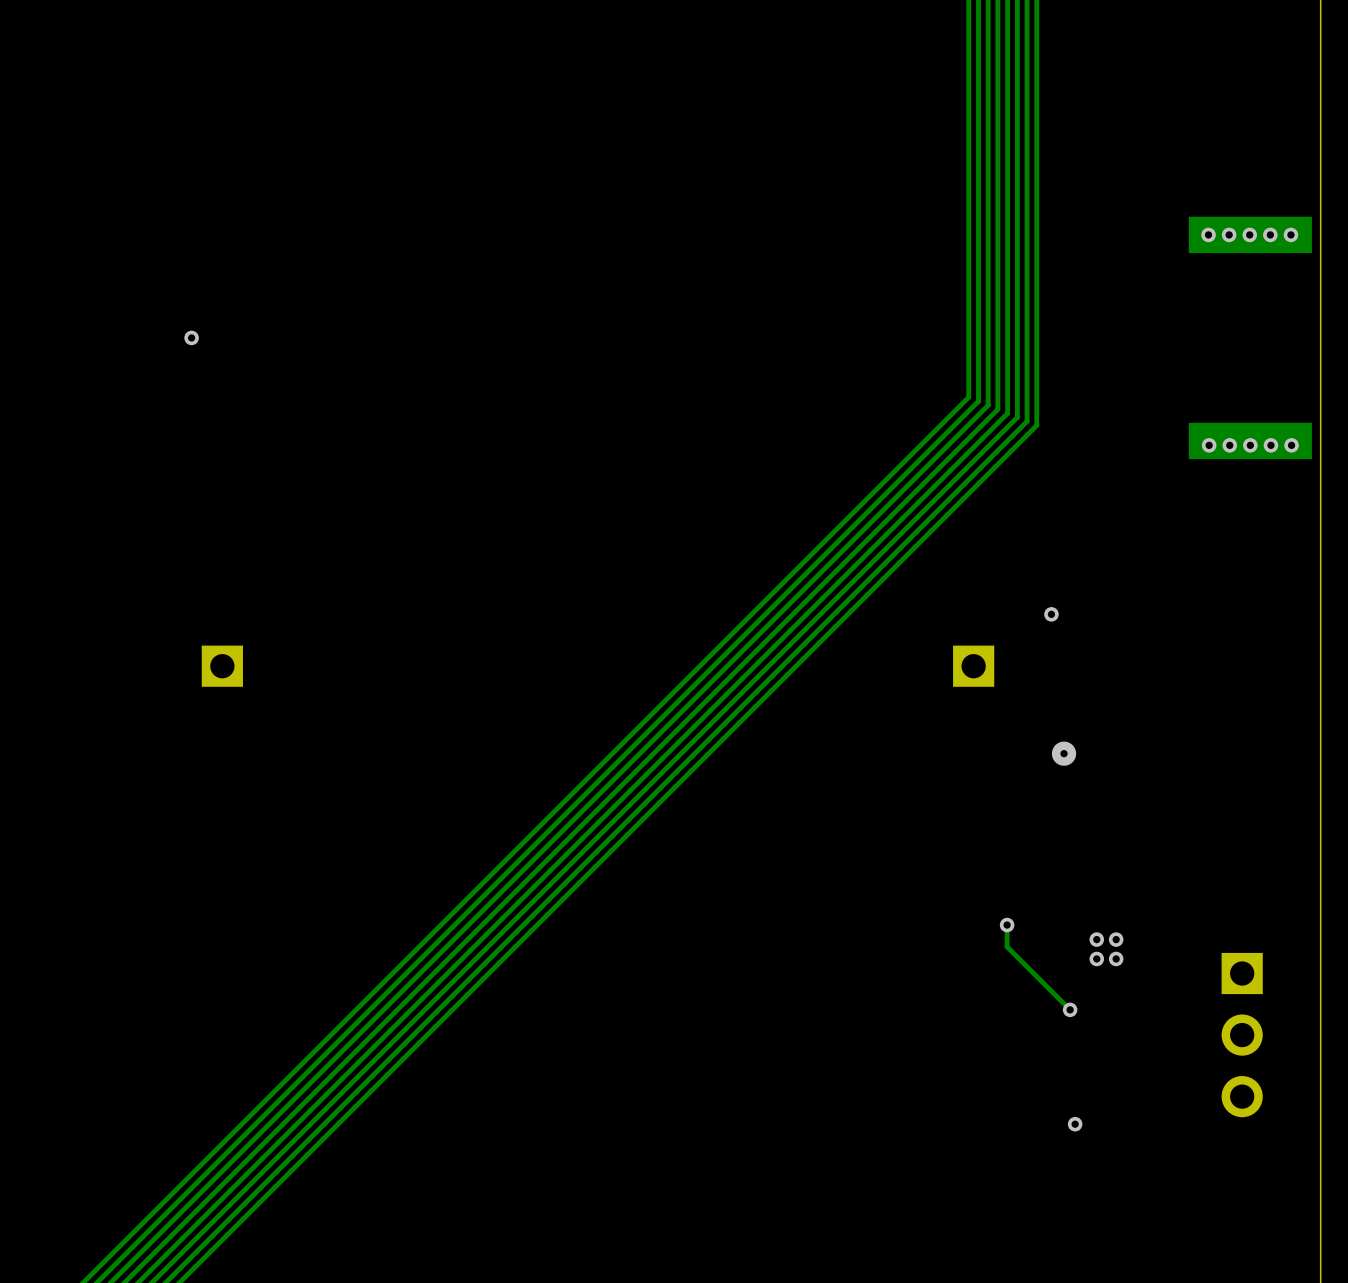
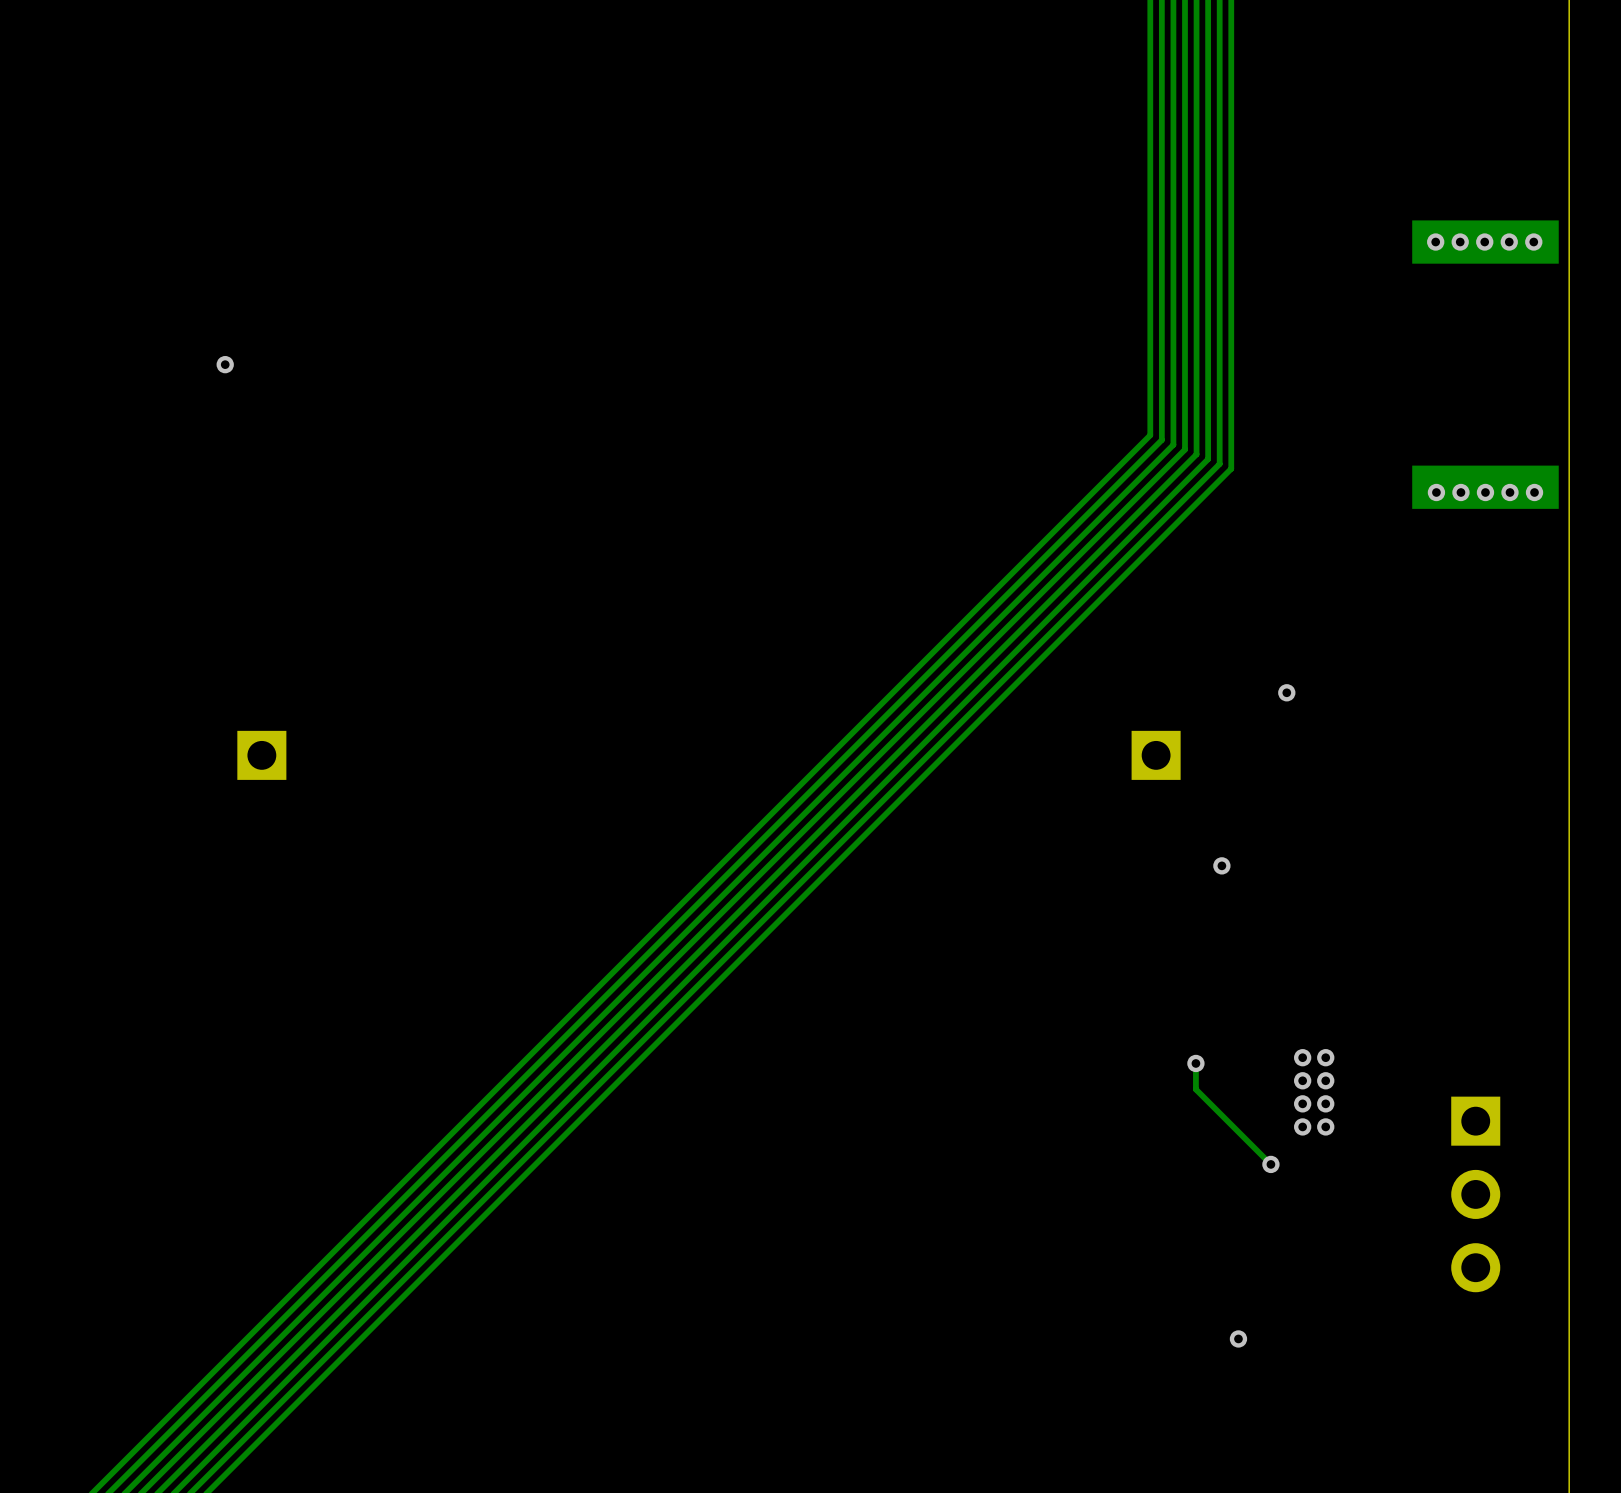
via position: (1051, 614) -> (1286, 692)
via: (1064, 753) -> none
via: none -> (1221, 865)
via: none -> (1302, 1057)
via: none -> (1325, 1057)
via: none -> (1302, 1126)
via: none -> (1325, 1126)
via position: (1075, 1124) -> (1238, 1338)

